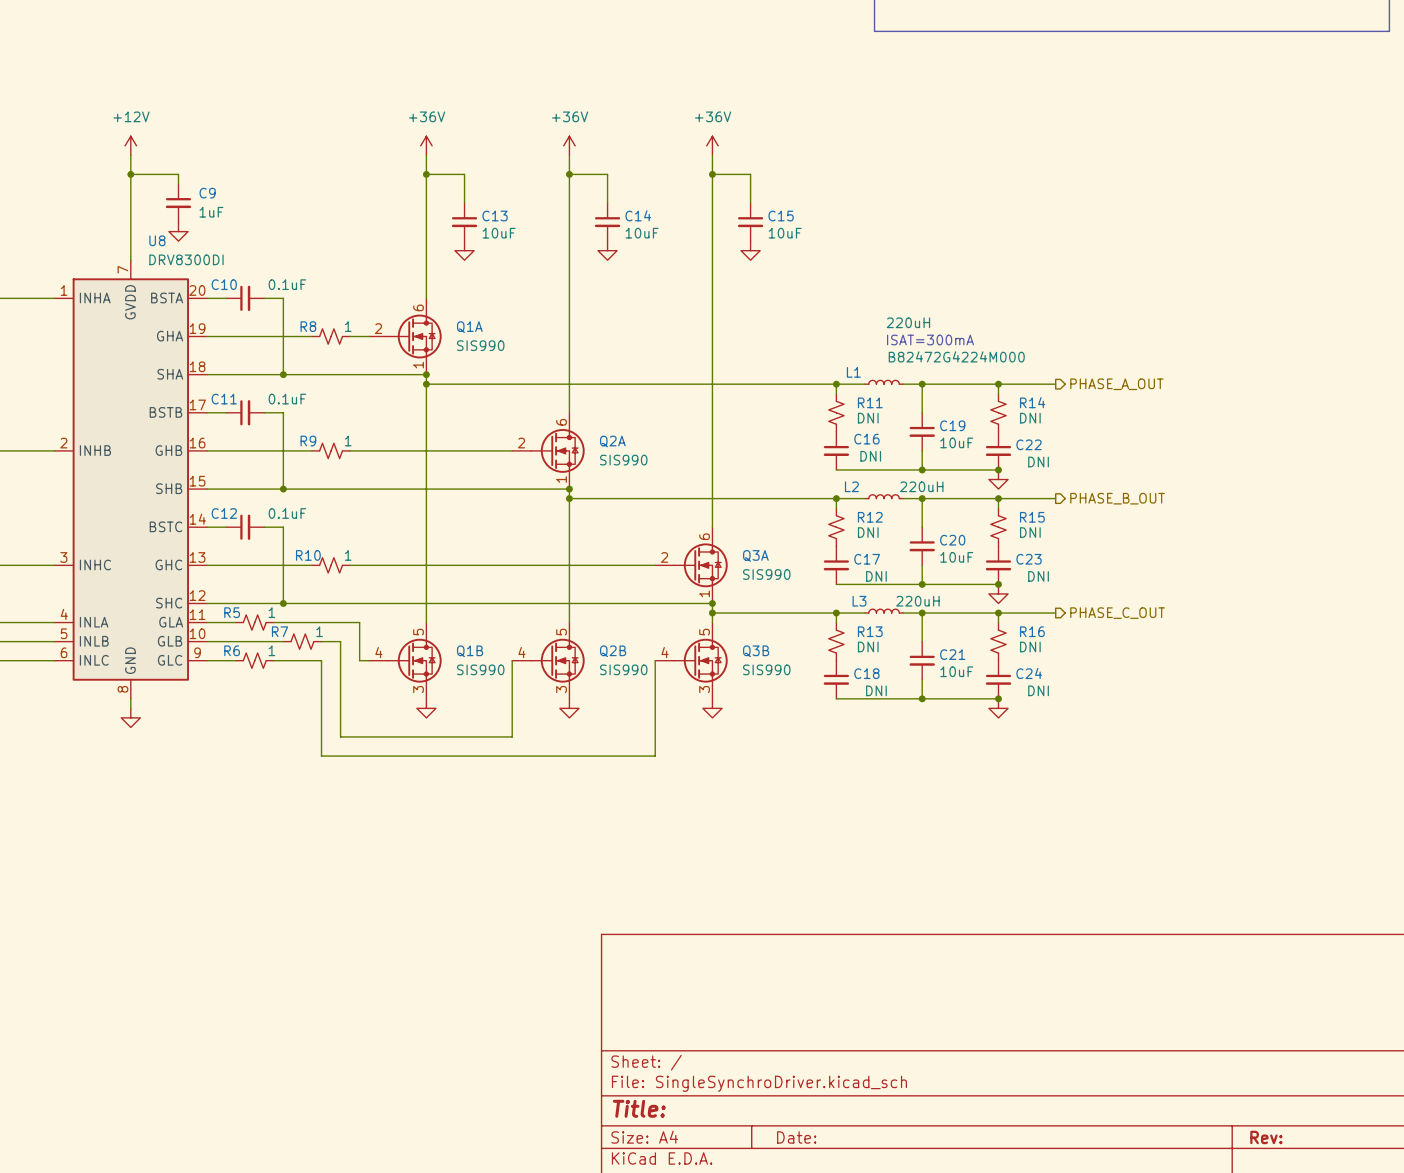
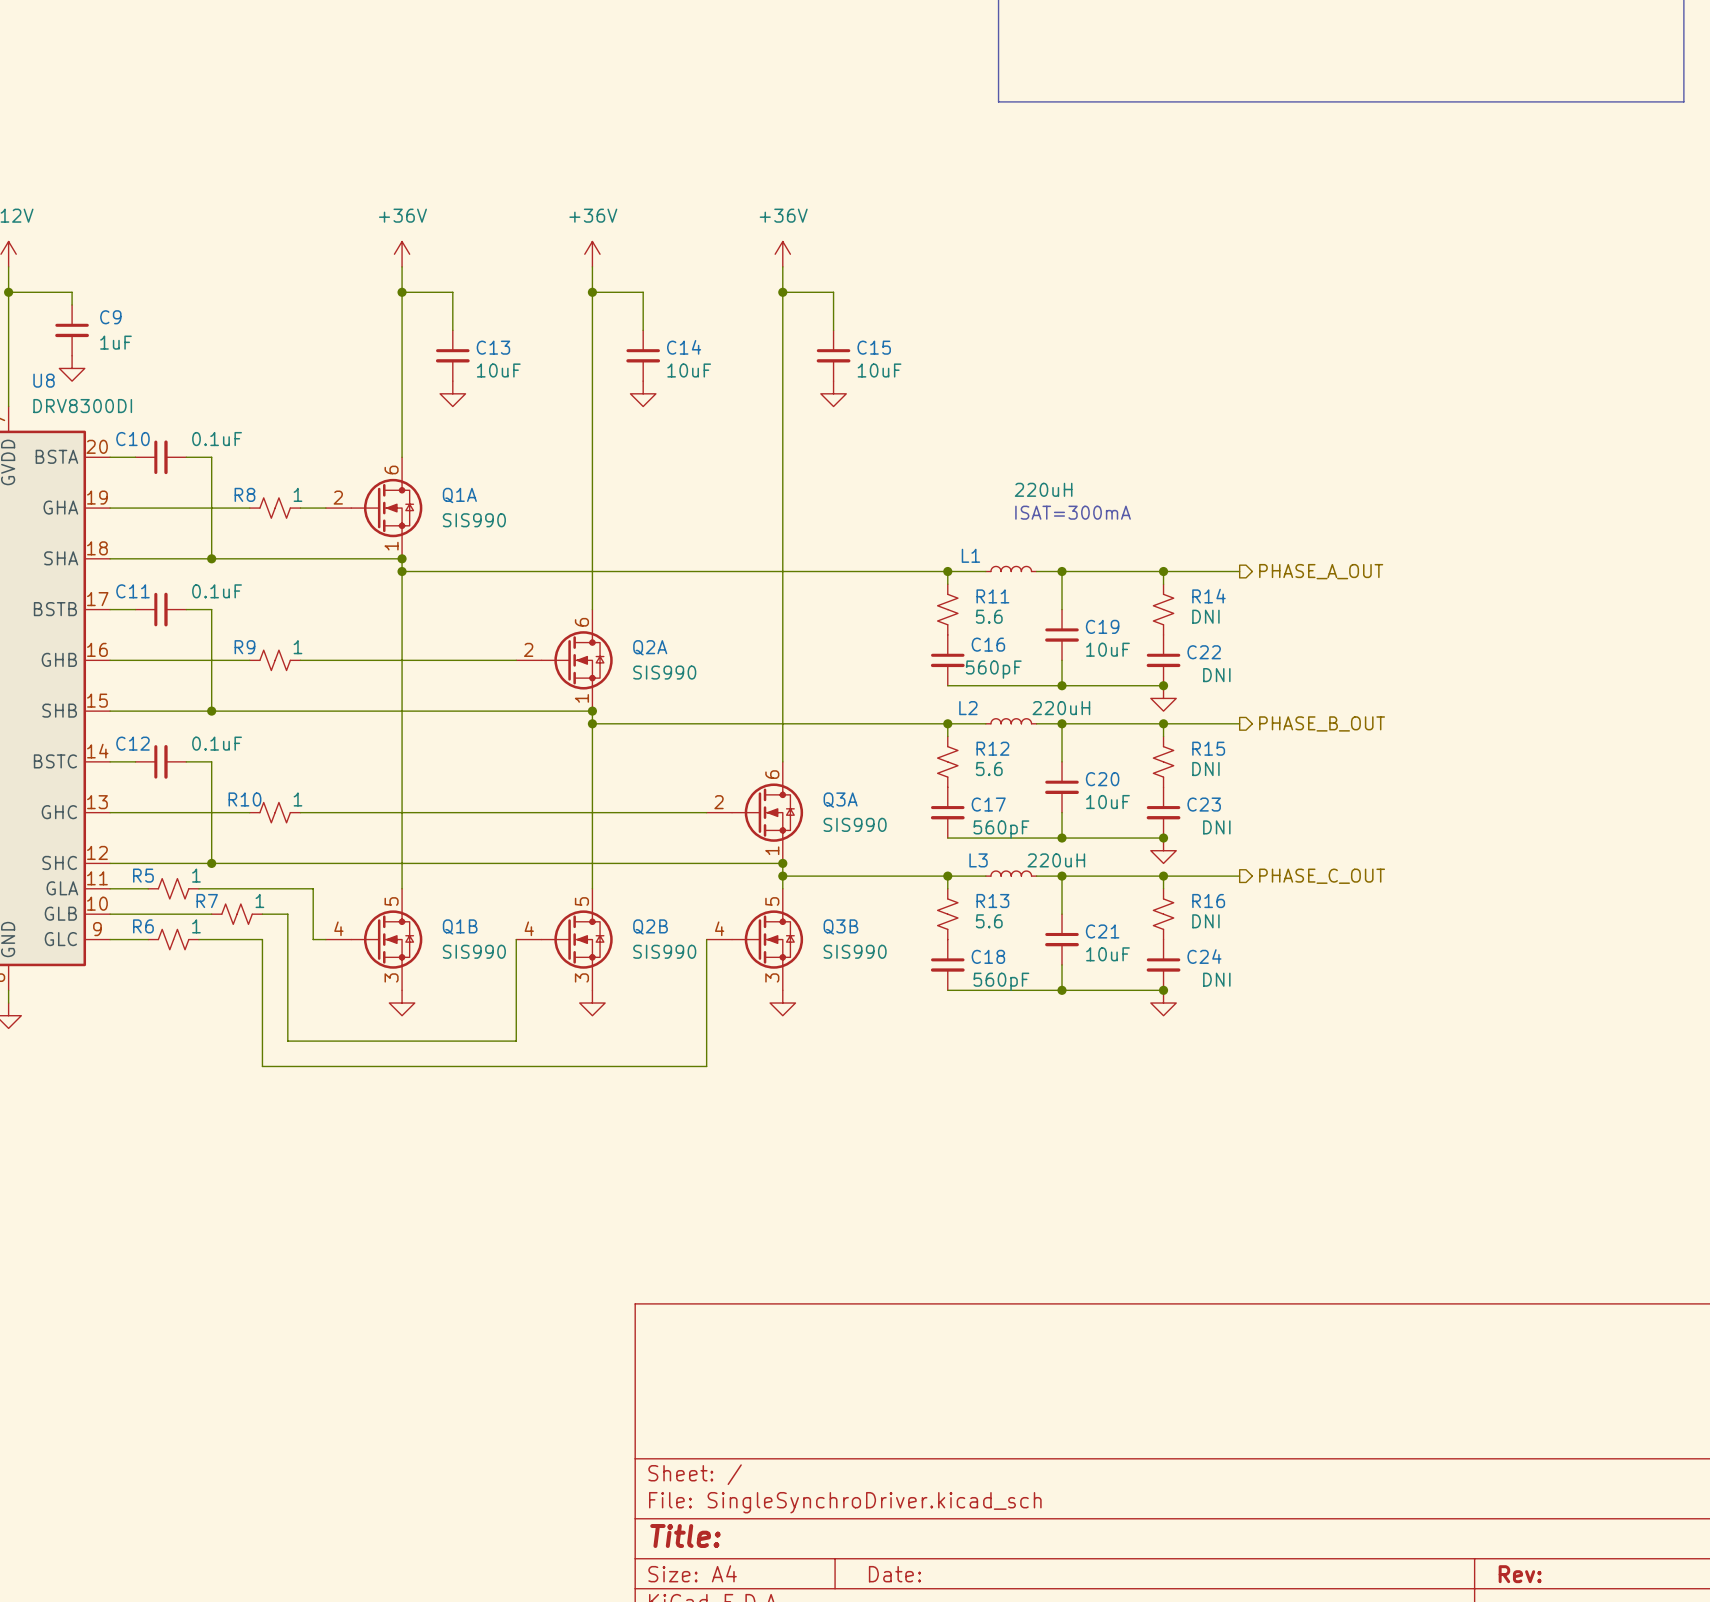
L1 text: B82472G4224M000 (956, 356) -> none
R11 value: DNI (868, 418) -> 5.6 (989, 616)
C16 value: DNI (870, 456) -> 560pF (993, 669)
R12 value: DNI (868, 532) -> 5.6 (989, 769)
C17 value: DNI (876, 576) -> 560pF (1001, 829)
R13 value: DNI (868, 646) -> 5.6 (989, 921)
C18 value: DNI (876, 690) -> 560pF (1001, 981)

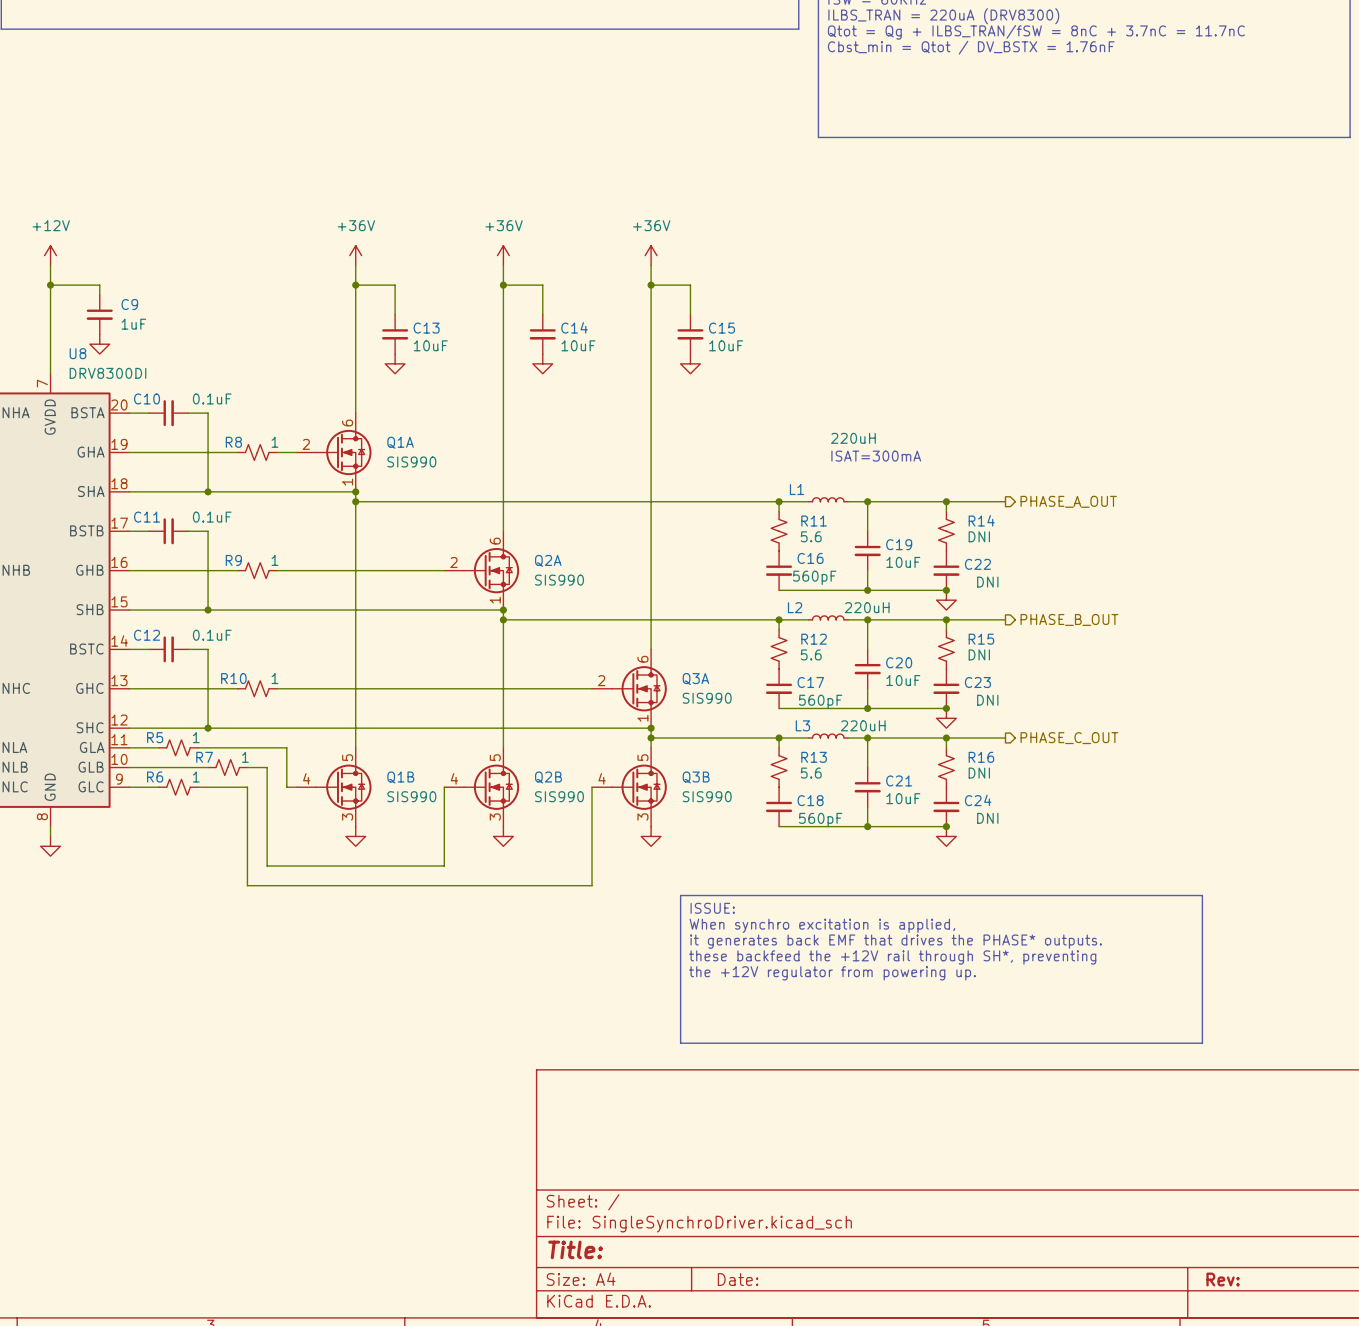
line: none -> (680, 895) (1202, 895) (1202, 1043) (680, 1043) (680, 895)
text: none -> ISSUE: (712, 908)
text: none -> When synchro excitation is applied, (822, 925)
text: none -> it generates back EMF that drives the PHASE* outputs. (895, 941)
text: none -> these backfeed the +12V rail through SH*, preventing (892, 957)
text: none -> the +12V regulator from powering up. (832, 973)

